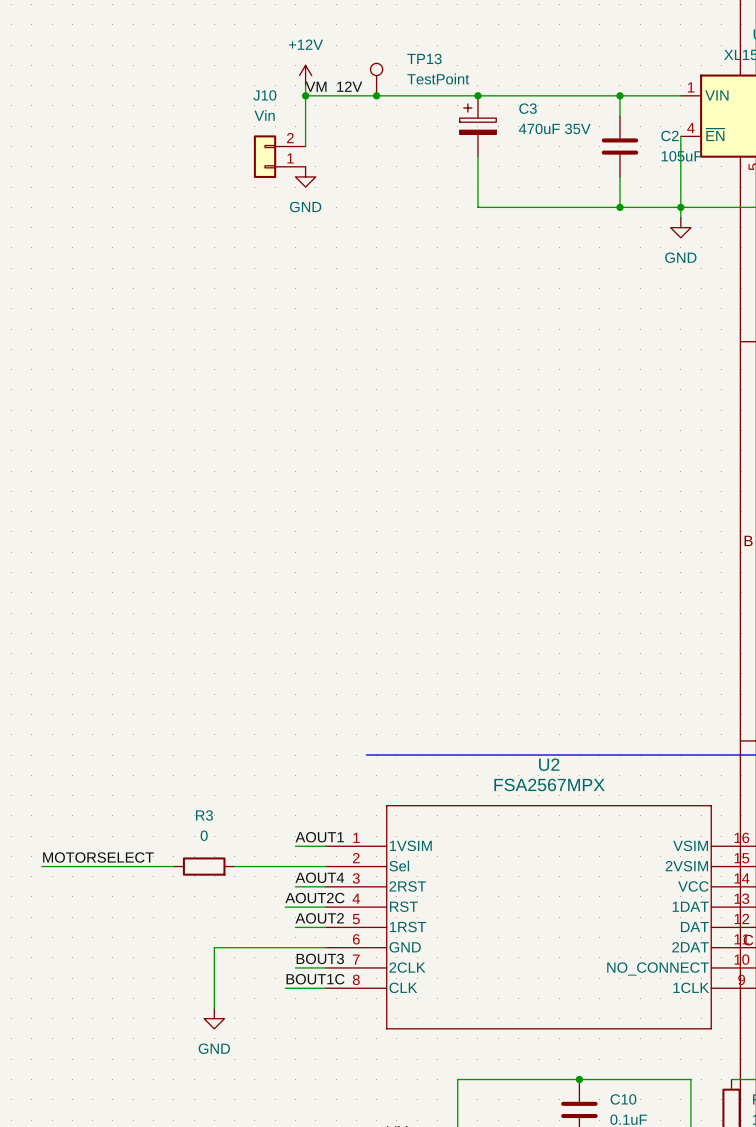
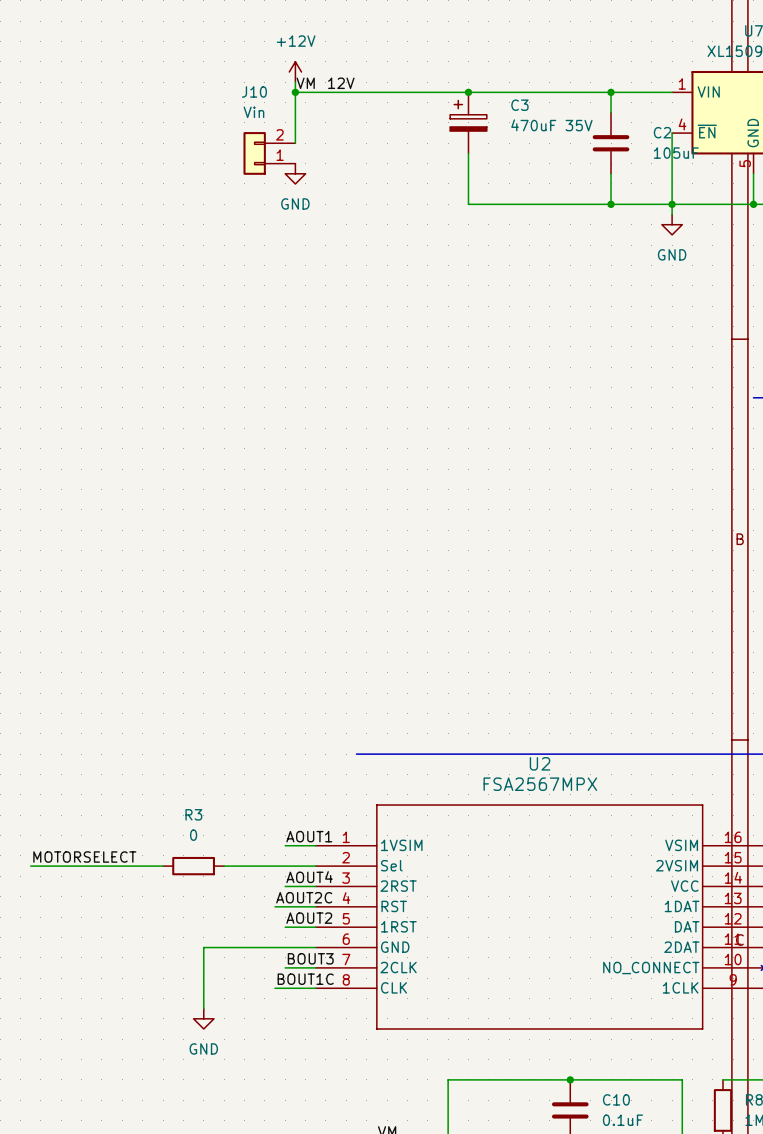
TP13: TestPoint (376, 79) -> none
junction: (376, 95) -> none

